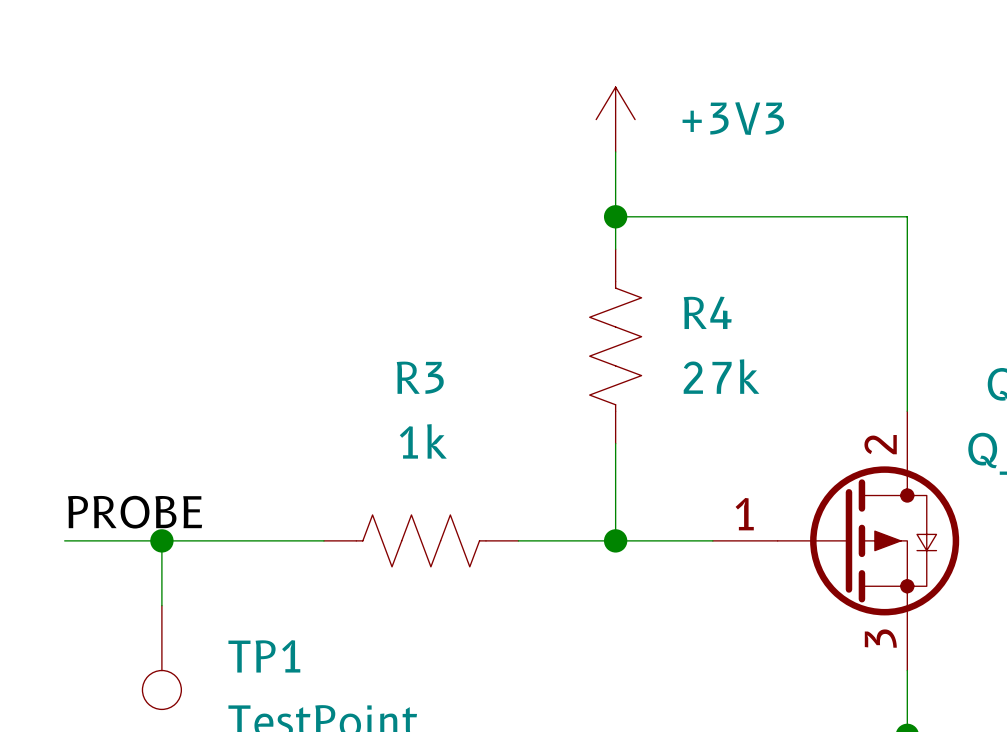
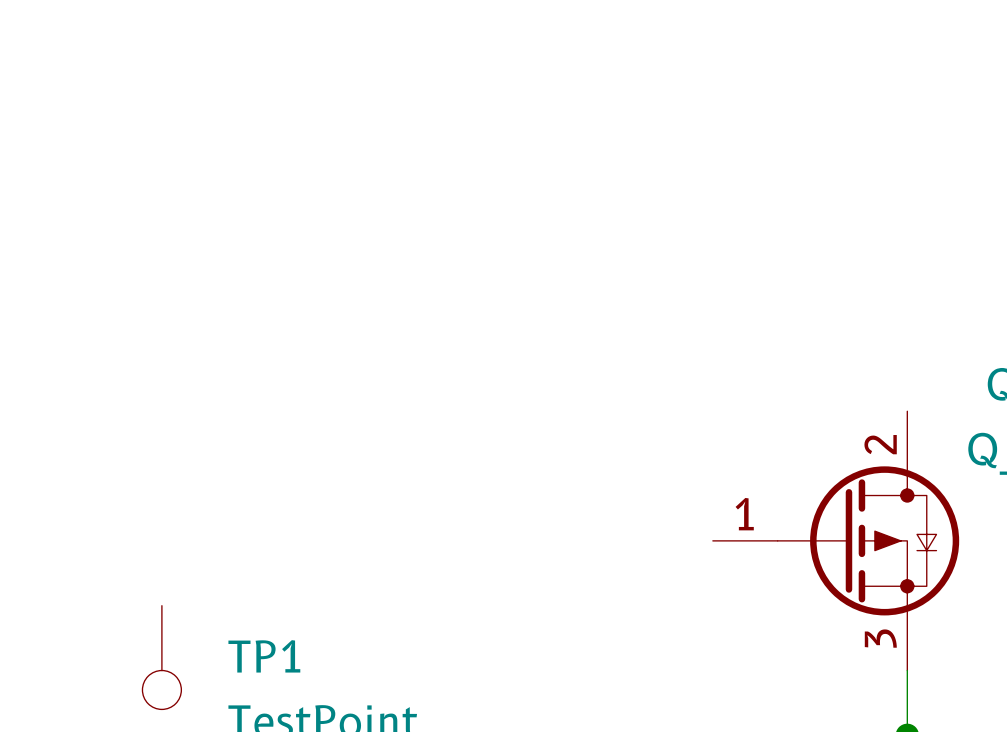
power symbol: +3V3 (615, 119) -> none
wire: (615, 151) (615, 249) -> none
wire: (615, 216) (907, 216) (907, 411) -> none
junction: (615, 216) -> none
R4: 27k (615, 346) -> none
wire: (615, 443) (615, 540) -> none
label: PROBE (135, 512) -> none
wire: (64, 540) (323, 540) -> none
wire: (161, 540) (161, 605) -> none
junction: (161, 540) -> none
R3: 1k (421, 540) -> none
wire: (518, 540) (712, 540) -> none
junction: (615, 540) -> none

